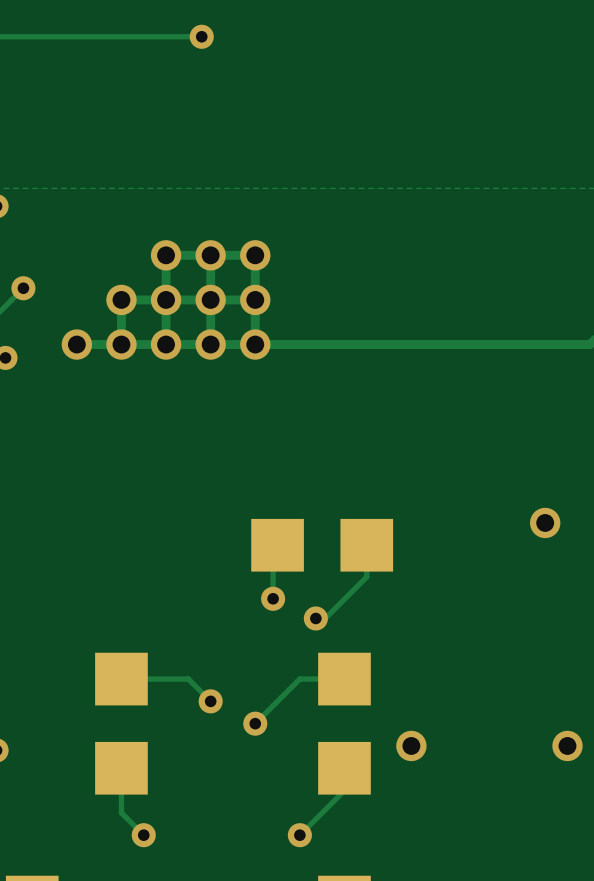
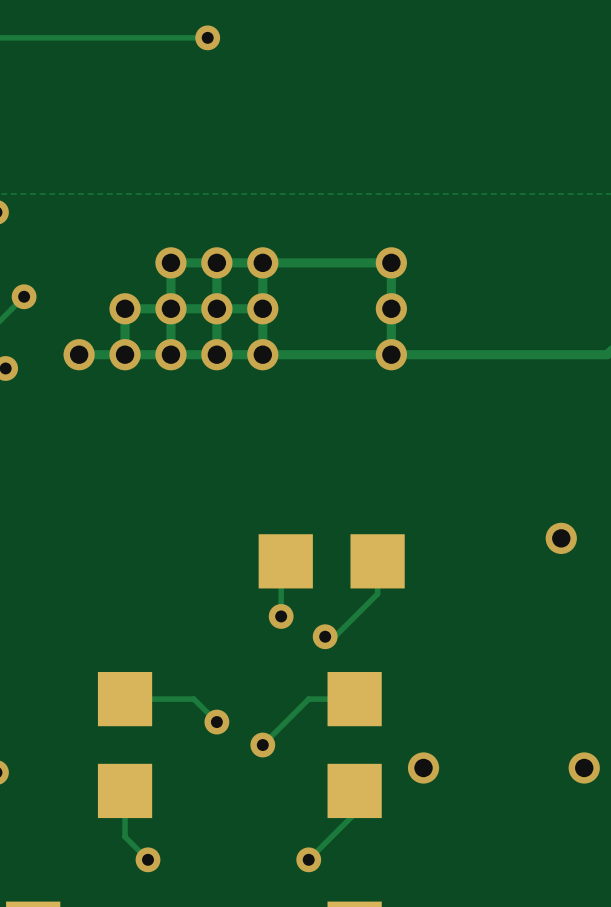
track: none -> (262, 262) (391, 262) (391, 354)
via: none -> (391, 262)
via: none -> (391, 308)
via: none -> (391, 354)

